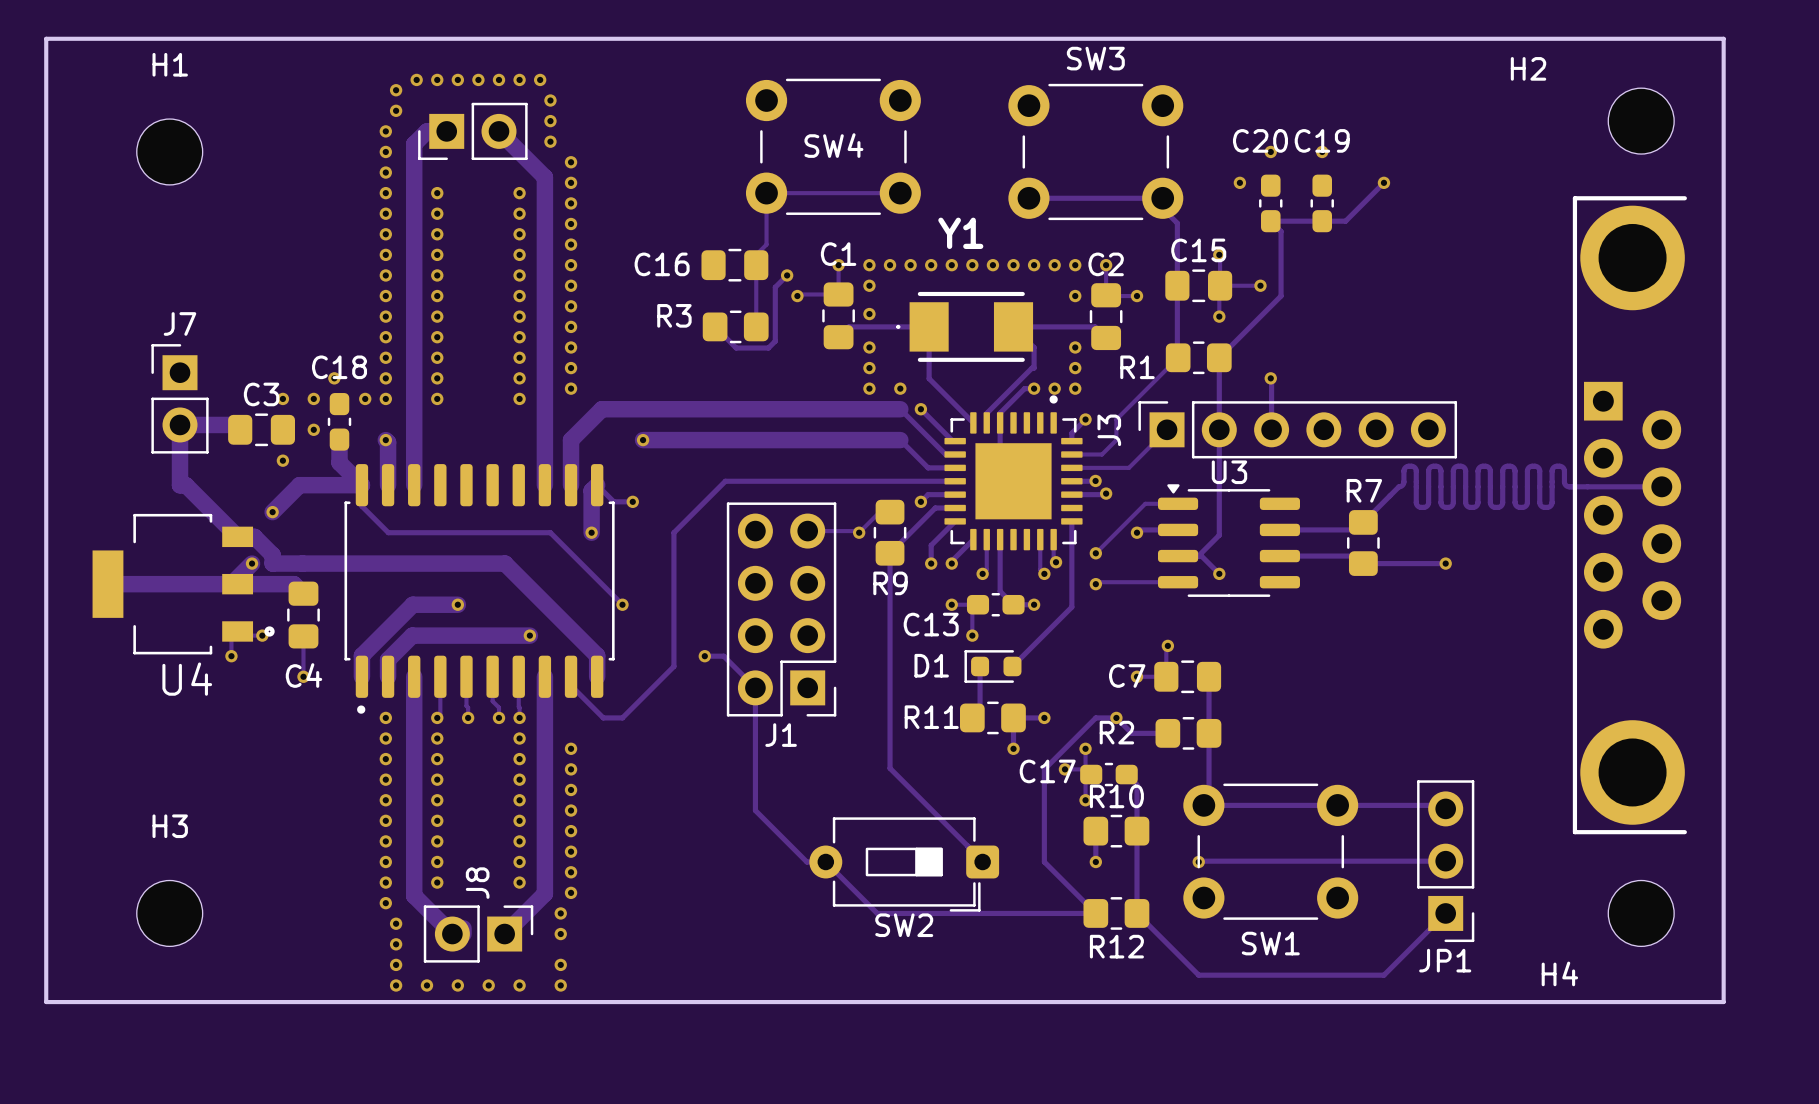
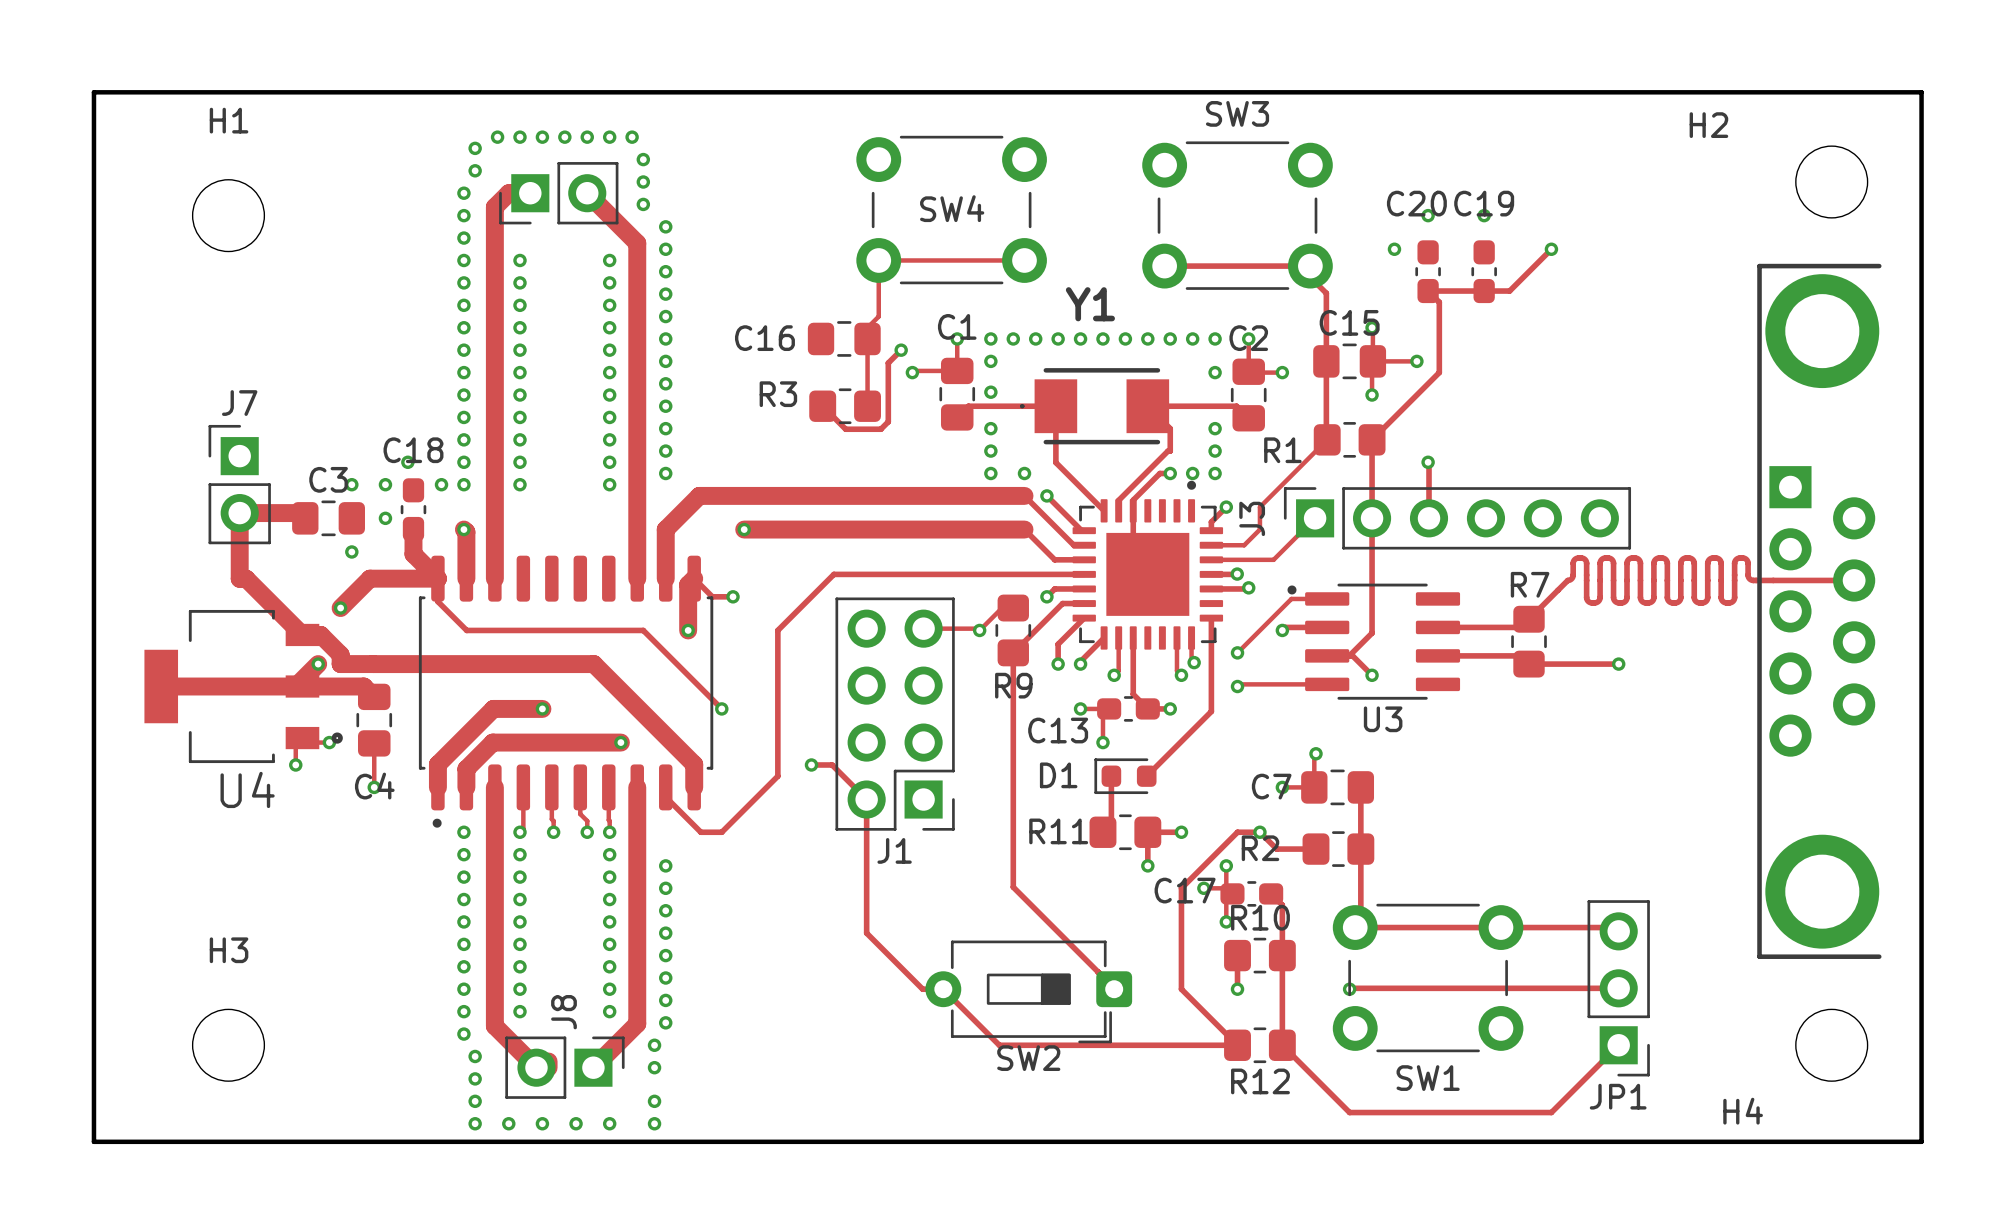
U3 name position: U3 (1229, 472) -> U3 (1383, 719)
U3 footprint: [1157, 484, 1300, 597] -> [1287, 583, 1461, 700]

